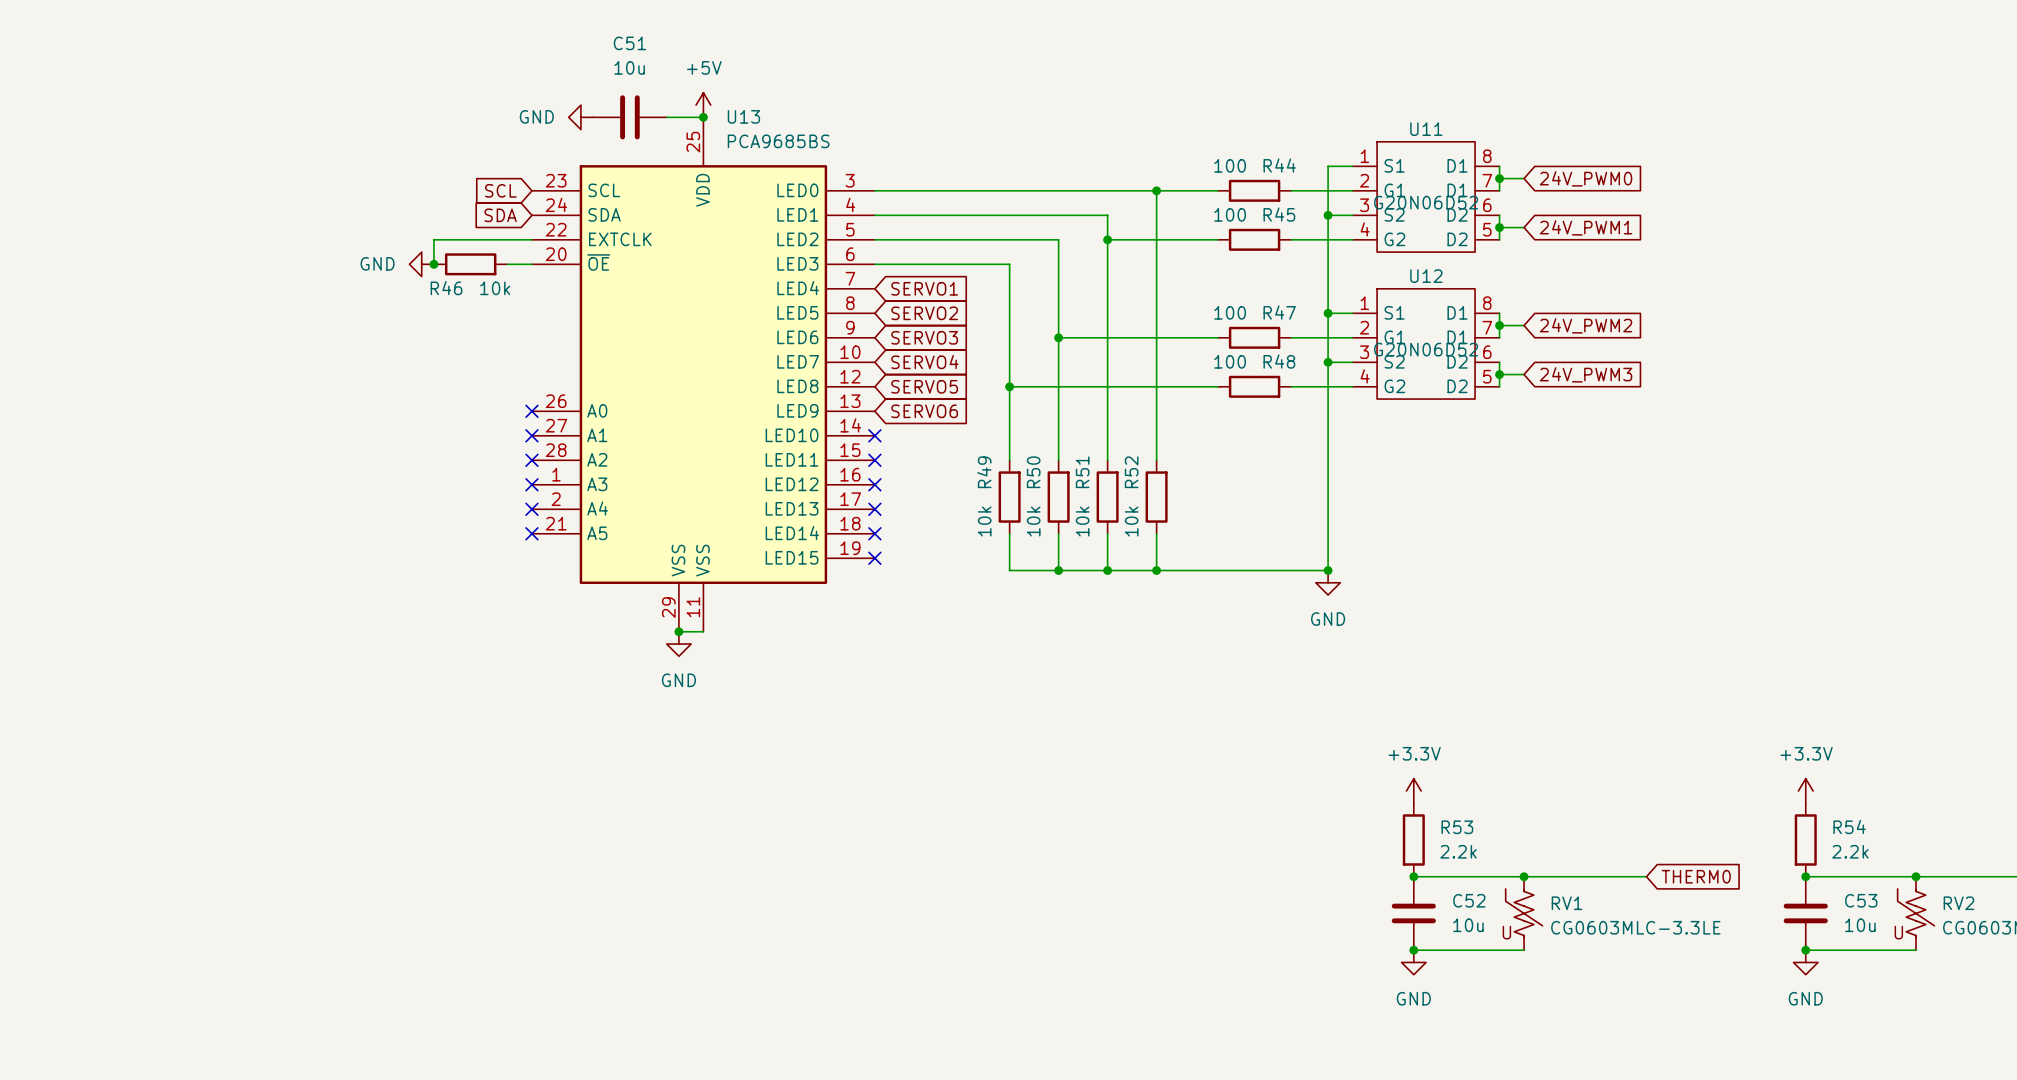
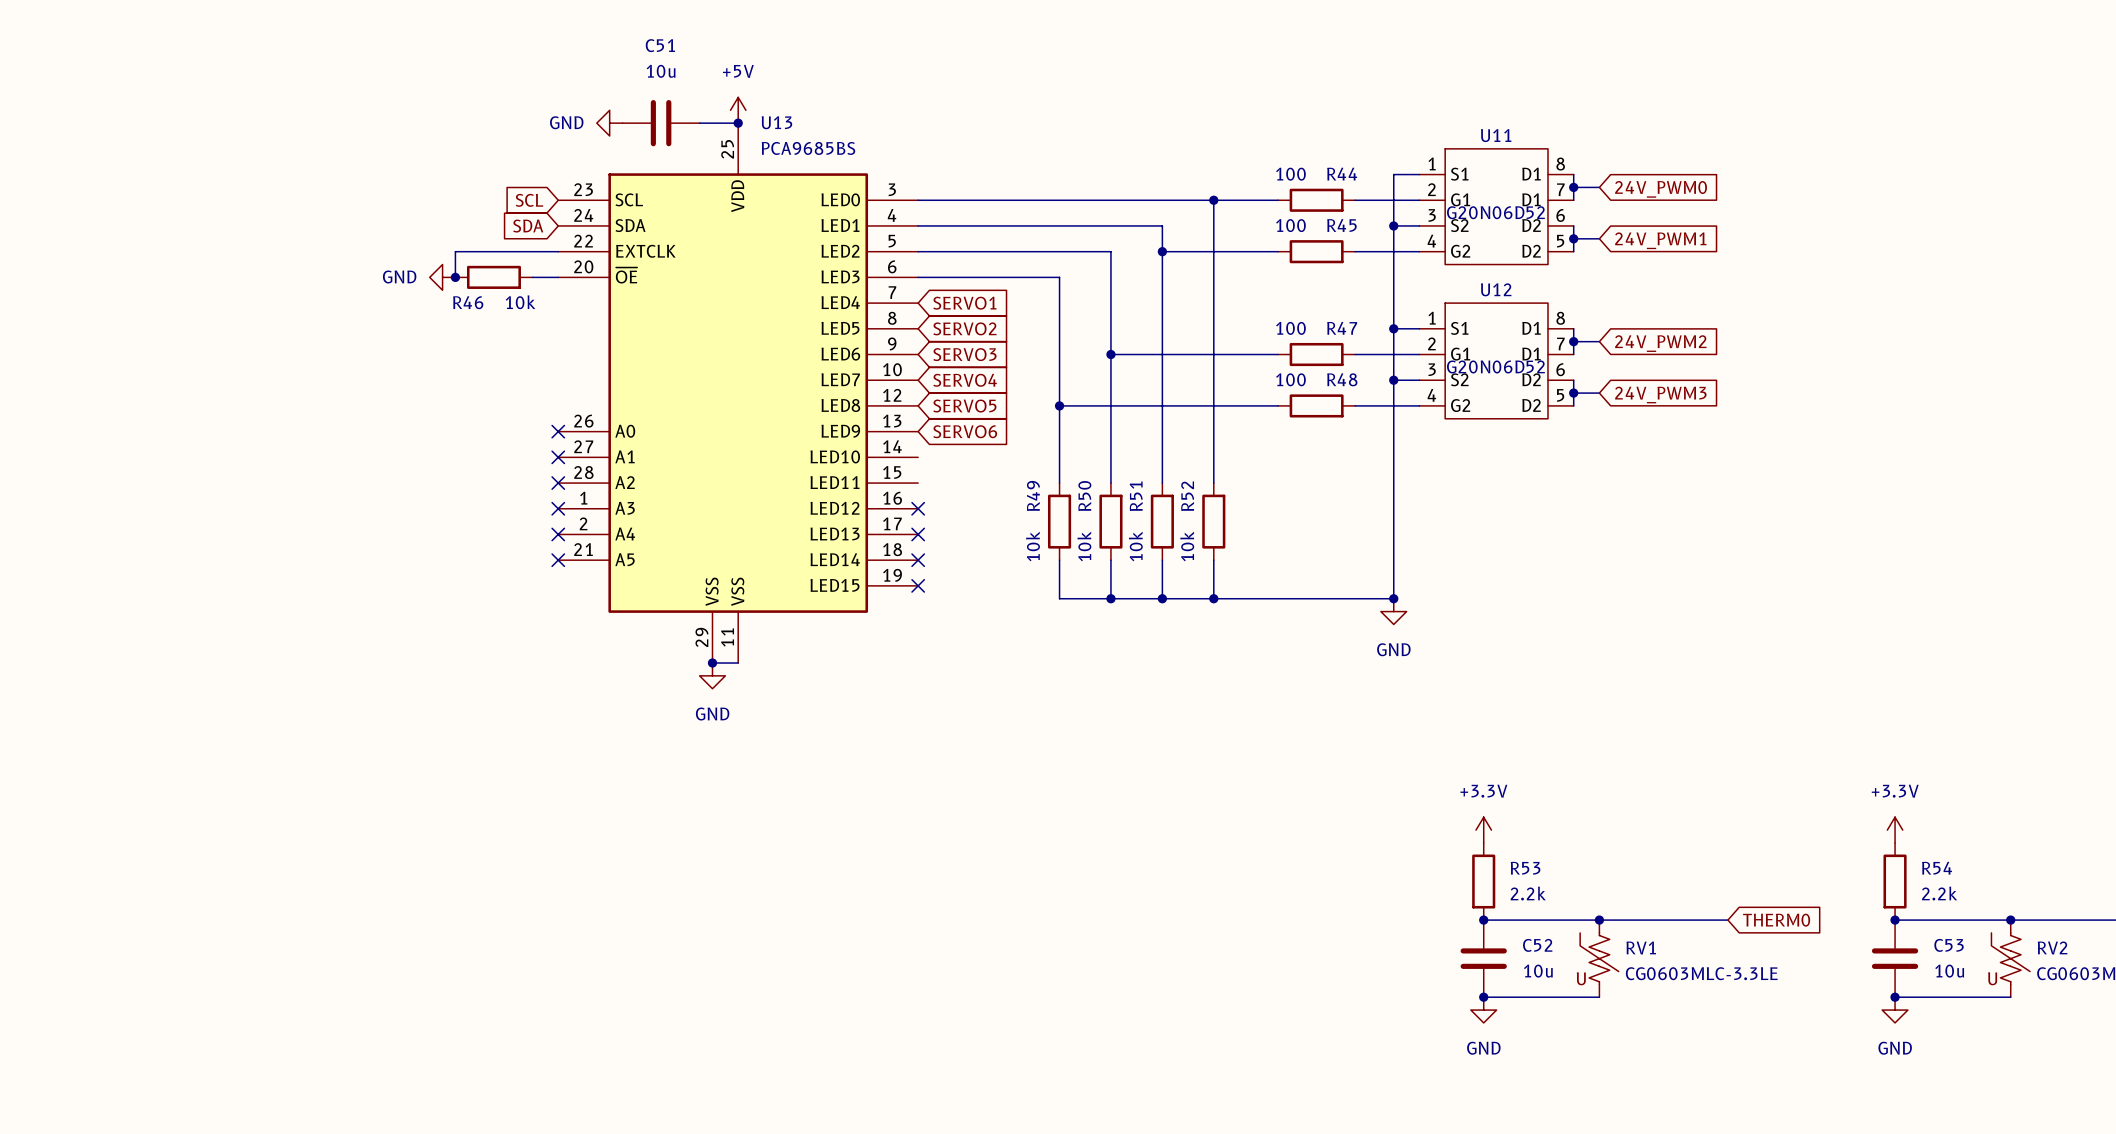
no-connect mark: (874, 435) -> none
no-connect mark: (874, 460) -> none

